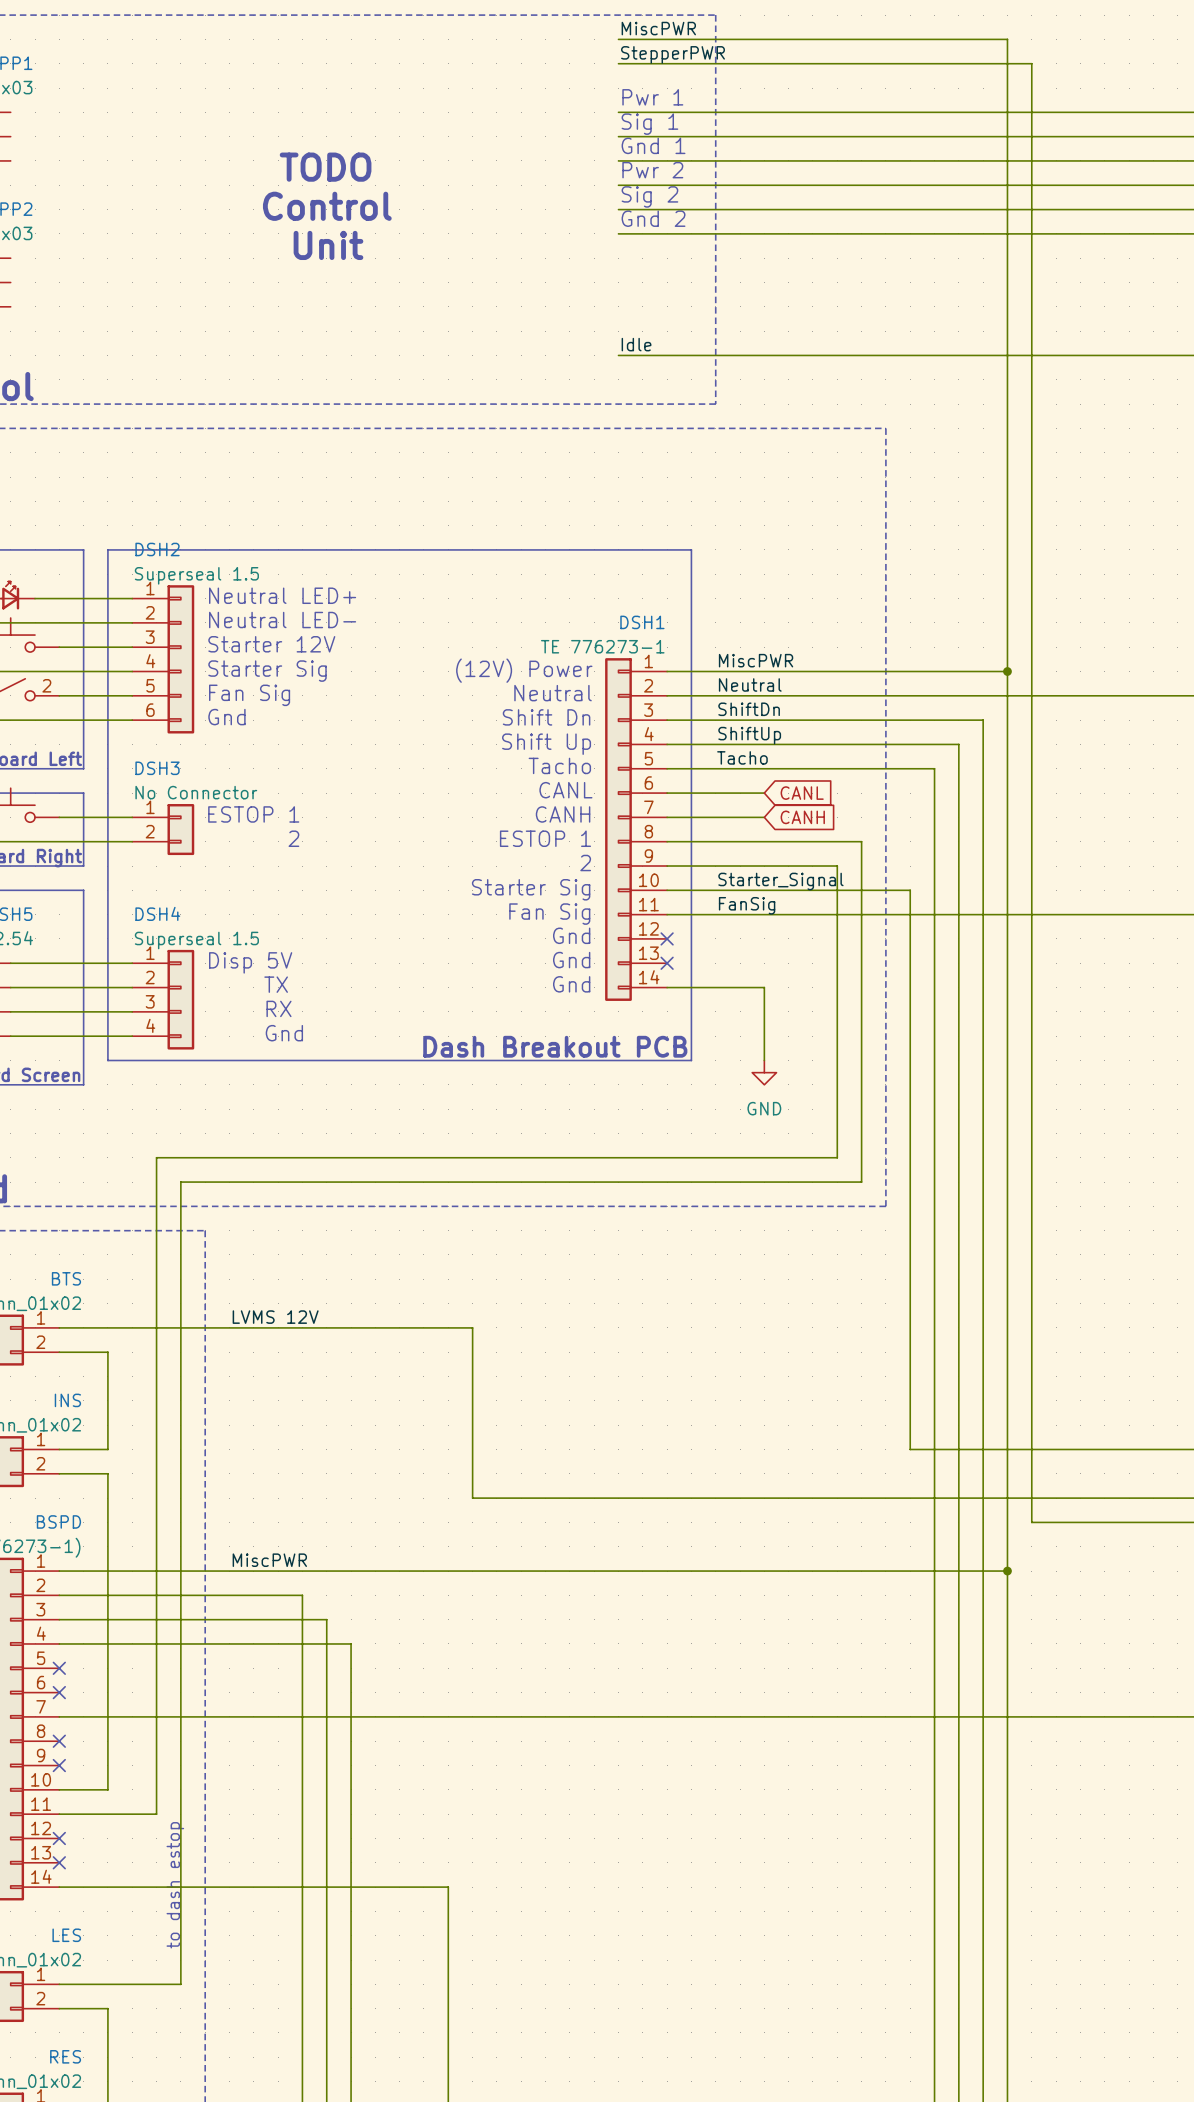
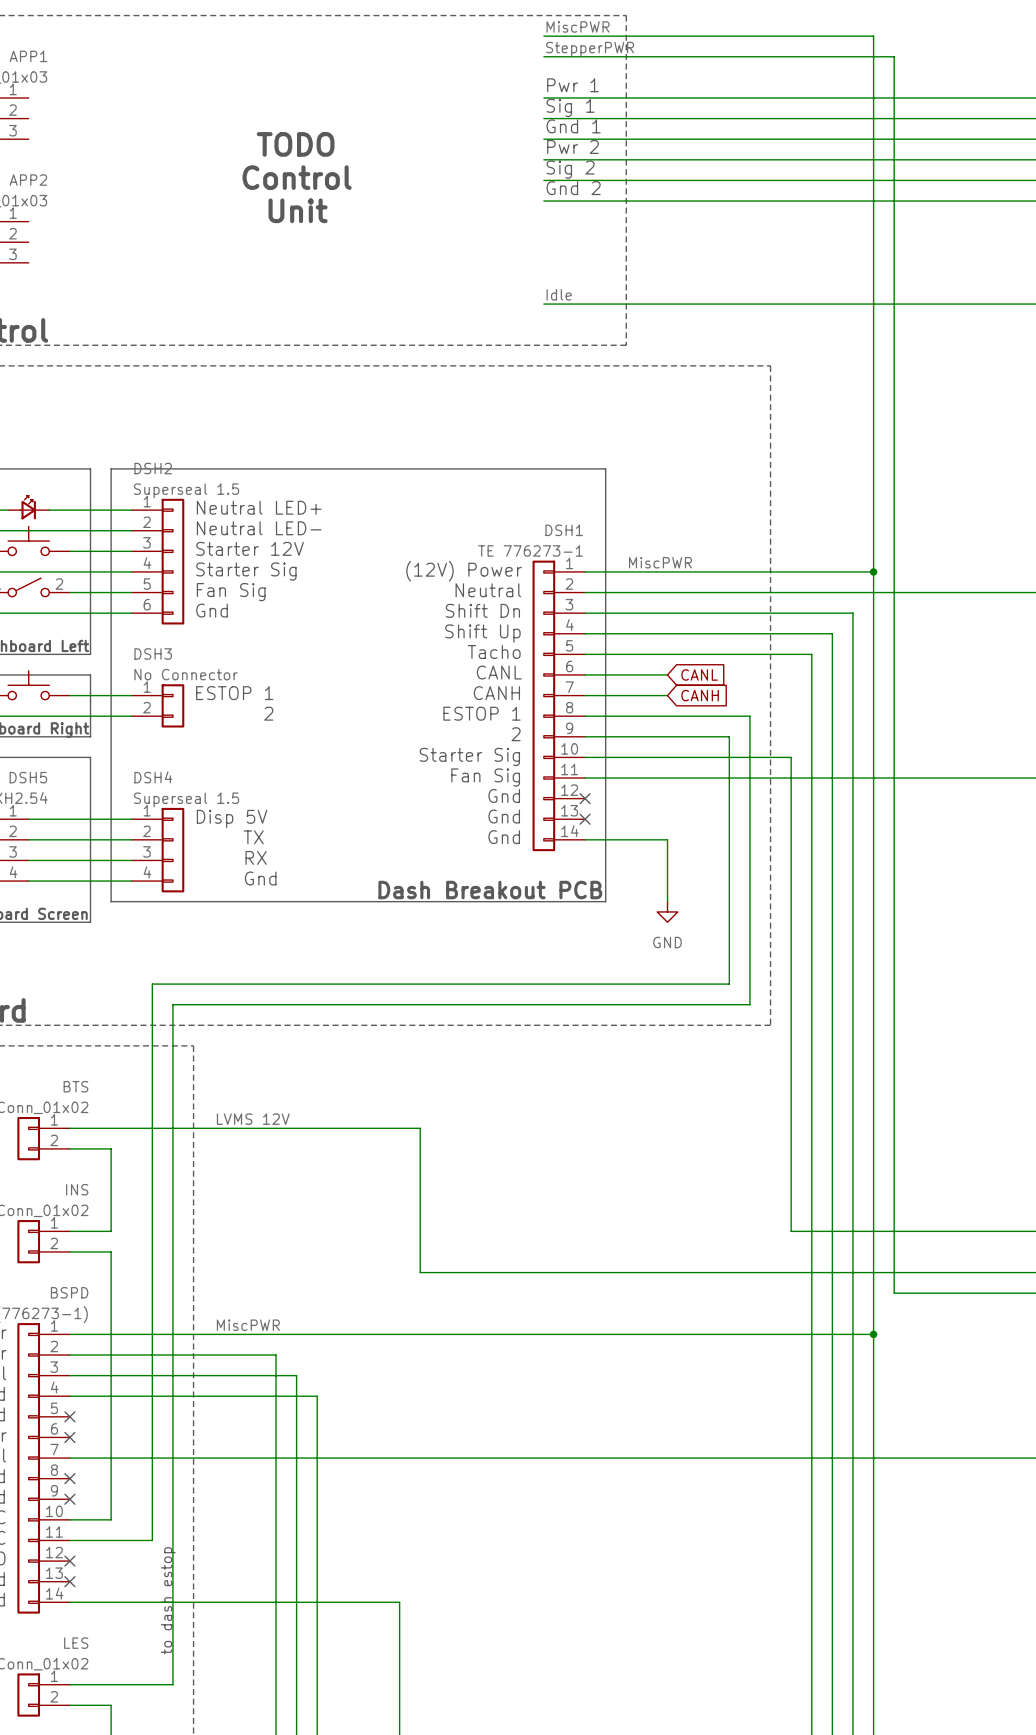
label: Neutral (750, 684) -> none
label: ShiftDn (749, 709) -> none
label: ShiftUp (749, 735) -> none
label: Tacho (742, 757) -> none
label: Starter_Signal (780, 881) -> none
label: FanSig (747, 905) -> none

